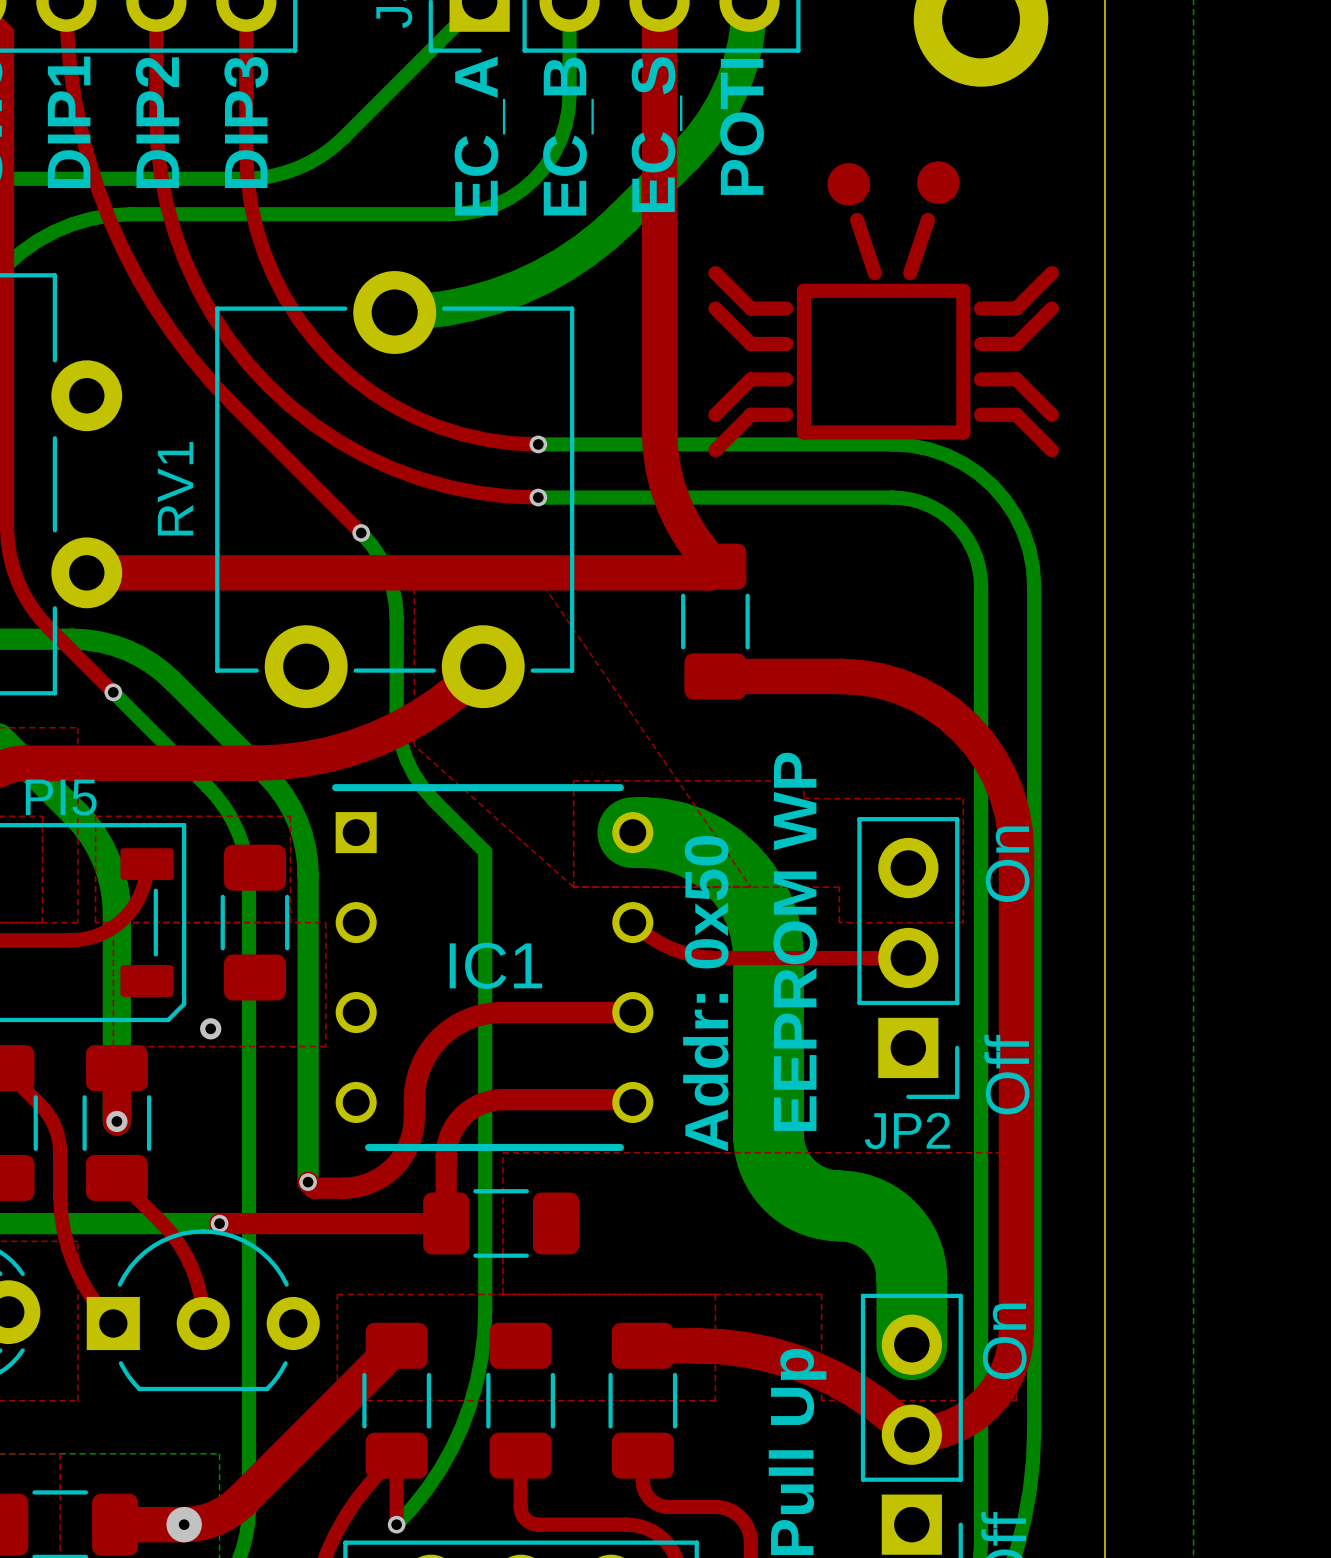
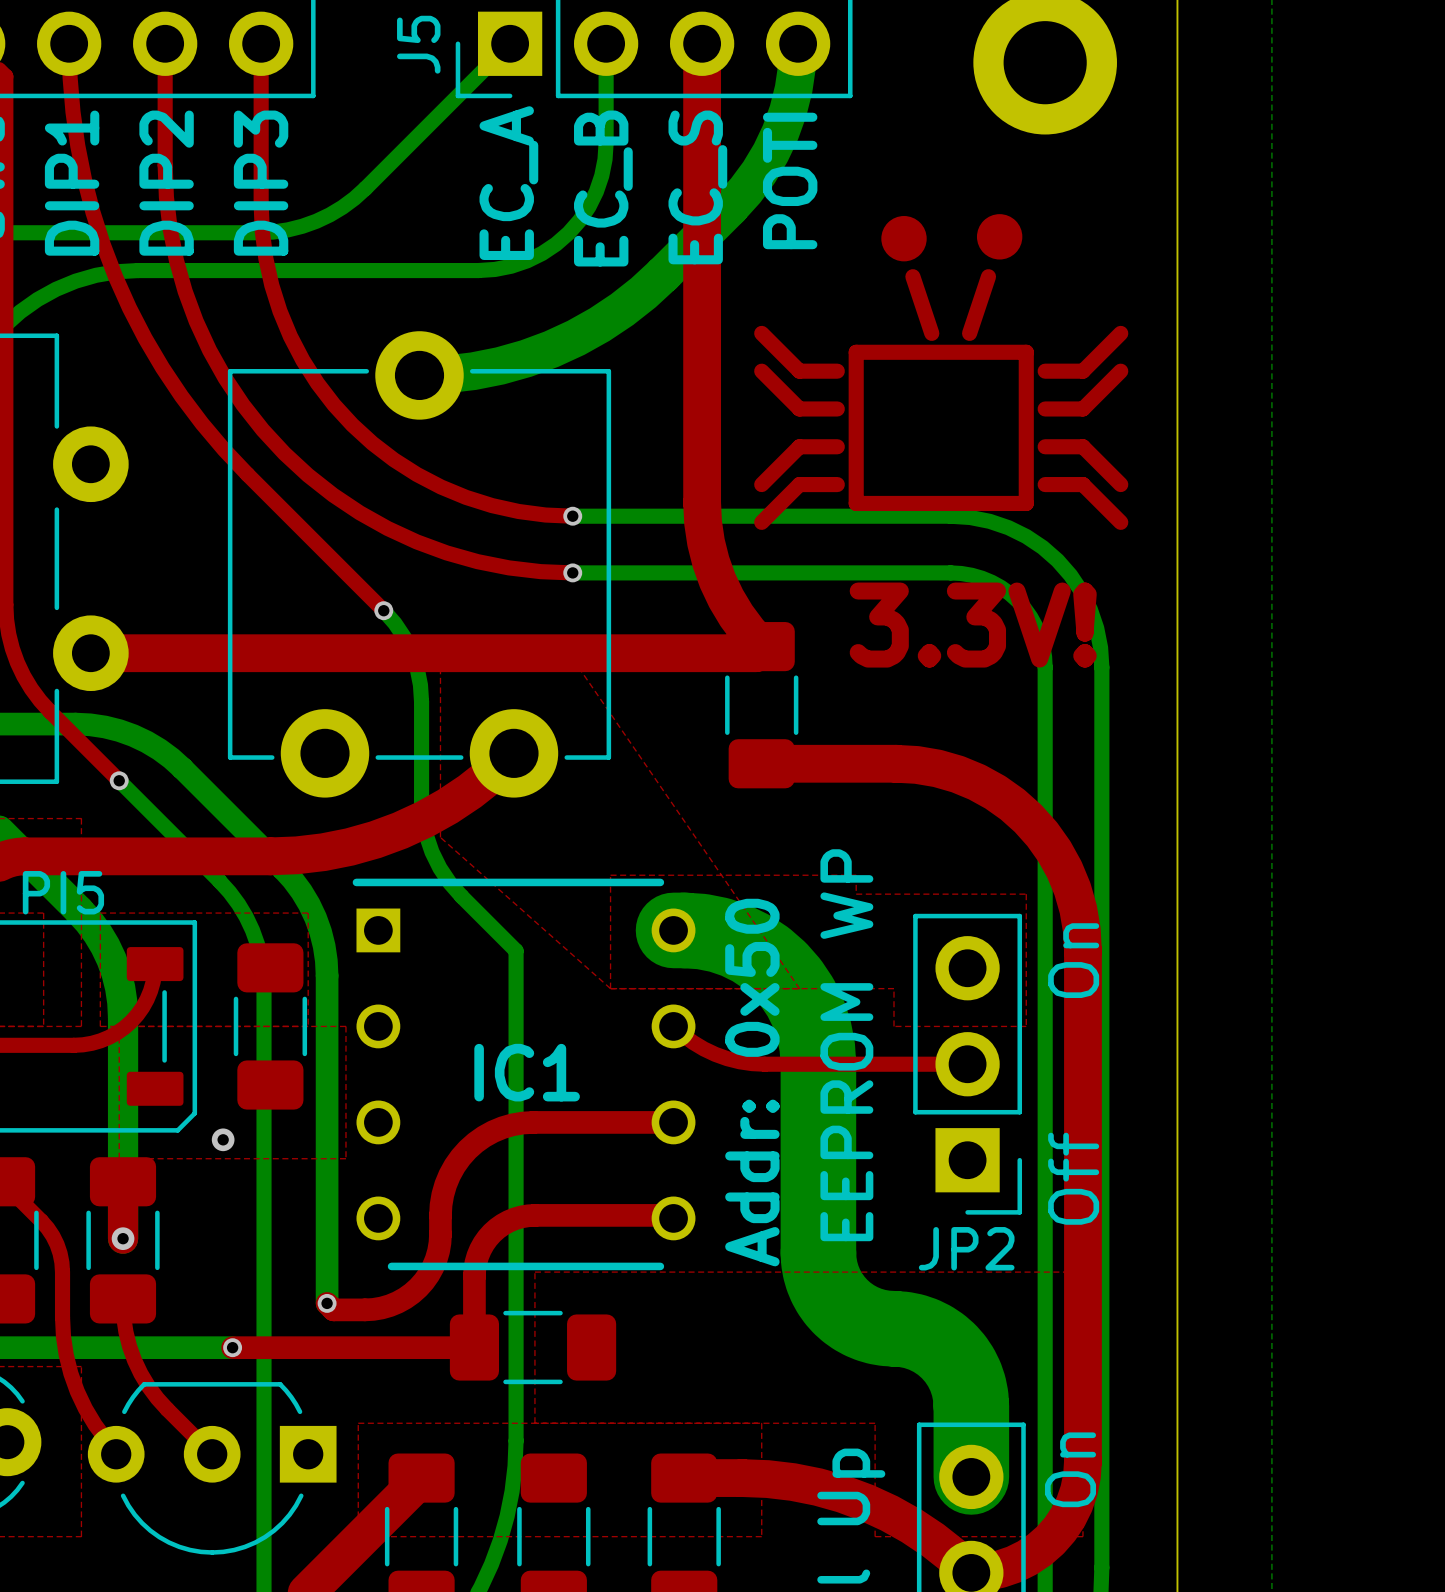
RV1 name: RV1 (175, 488) -> none
text: none -> 3.3V! (973, 625)
top track: (116, 1177) (170, 1232) (186, 1256) (197, 1282) (203, 1323) -> (123, 1298) (125, 1331) (140, 1373) (157, 1398) (212, 1454)
part rotation: 0° (203, 1310) -> 180° (212, 1468)

